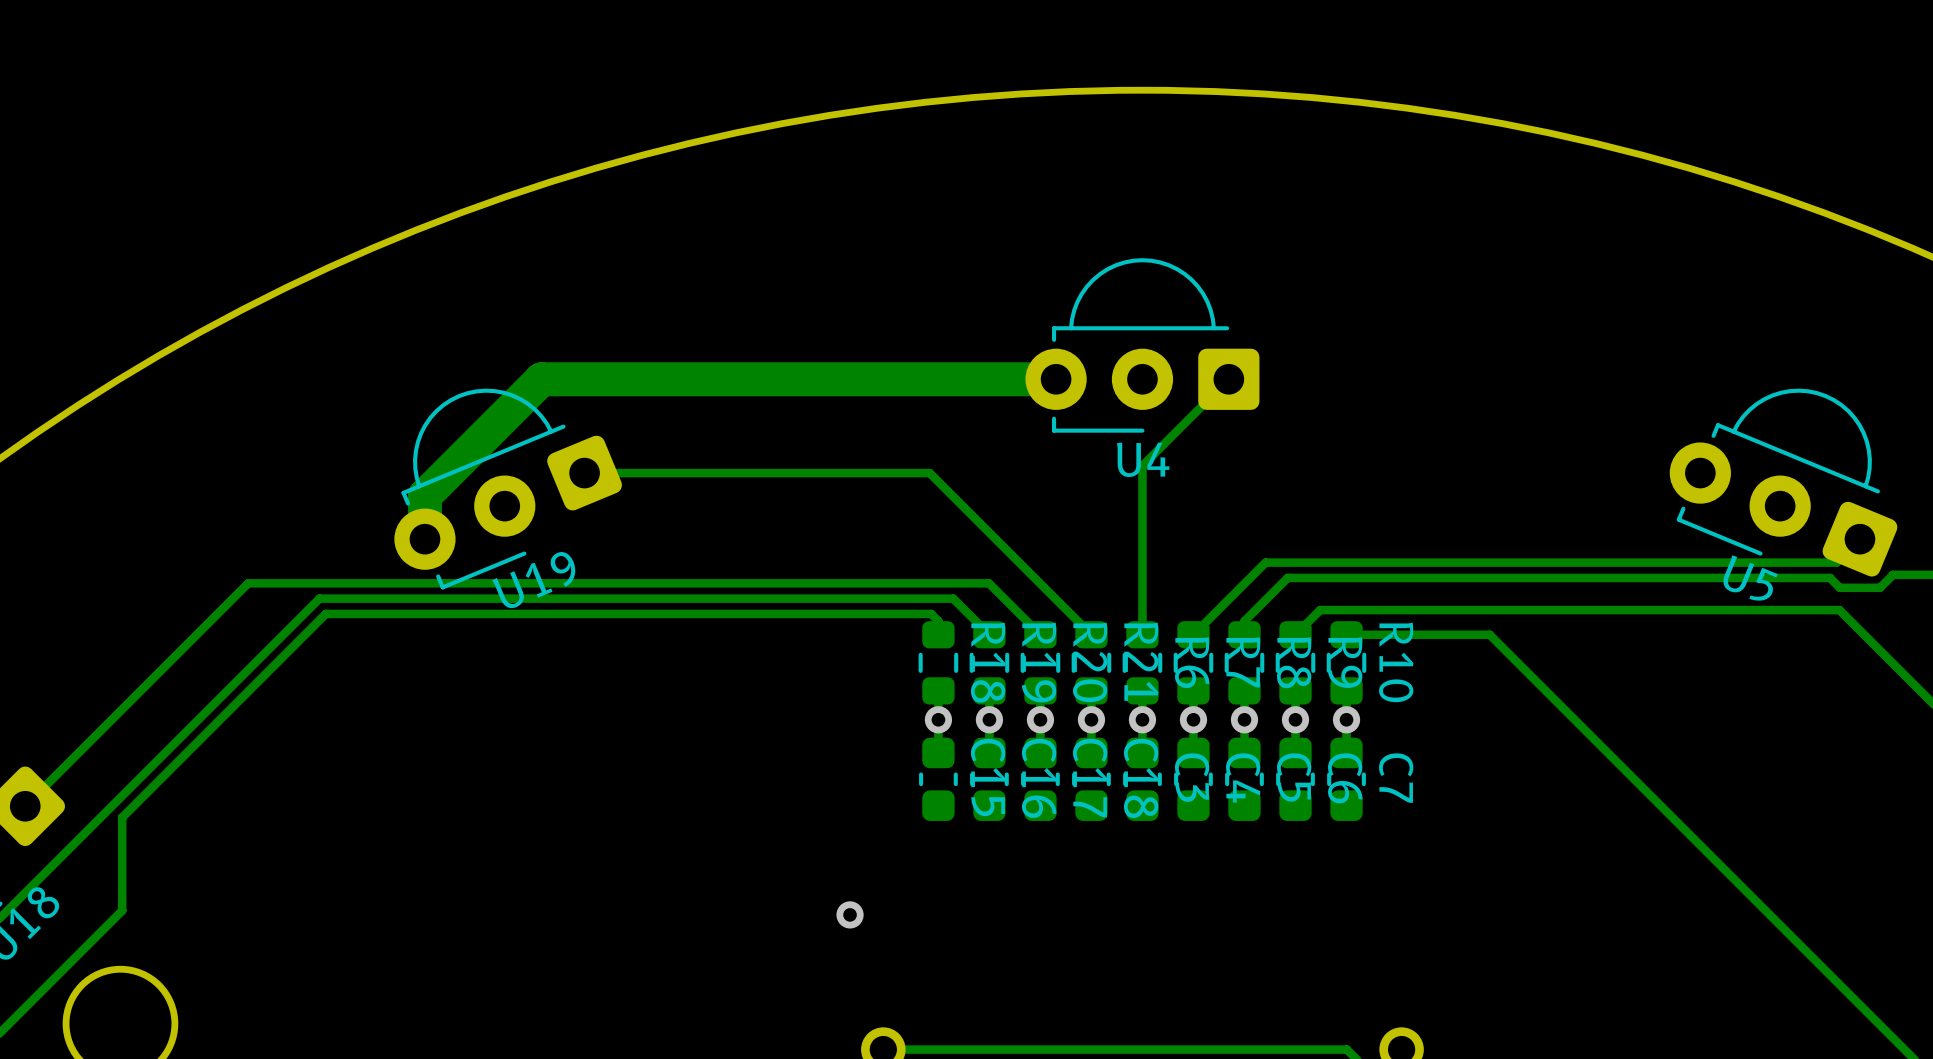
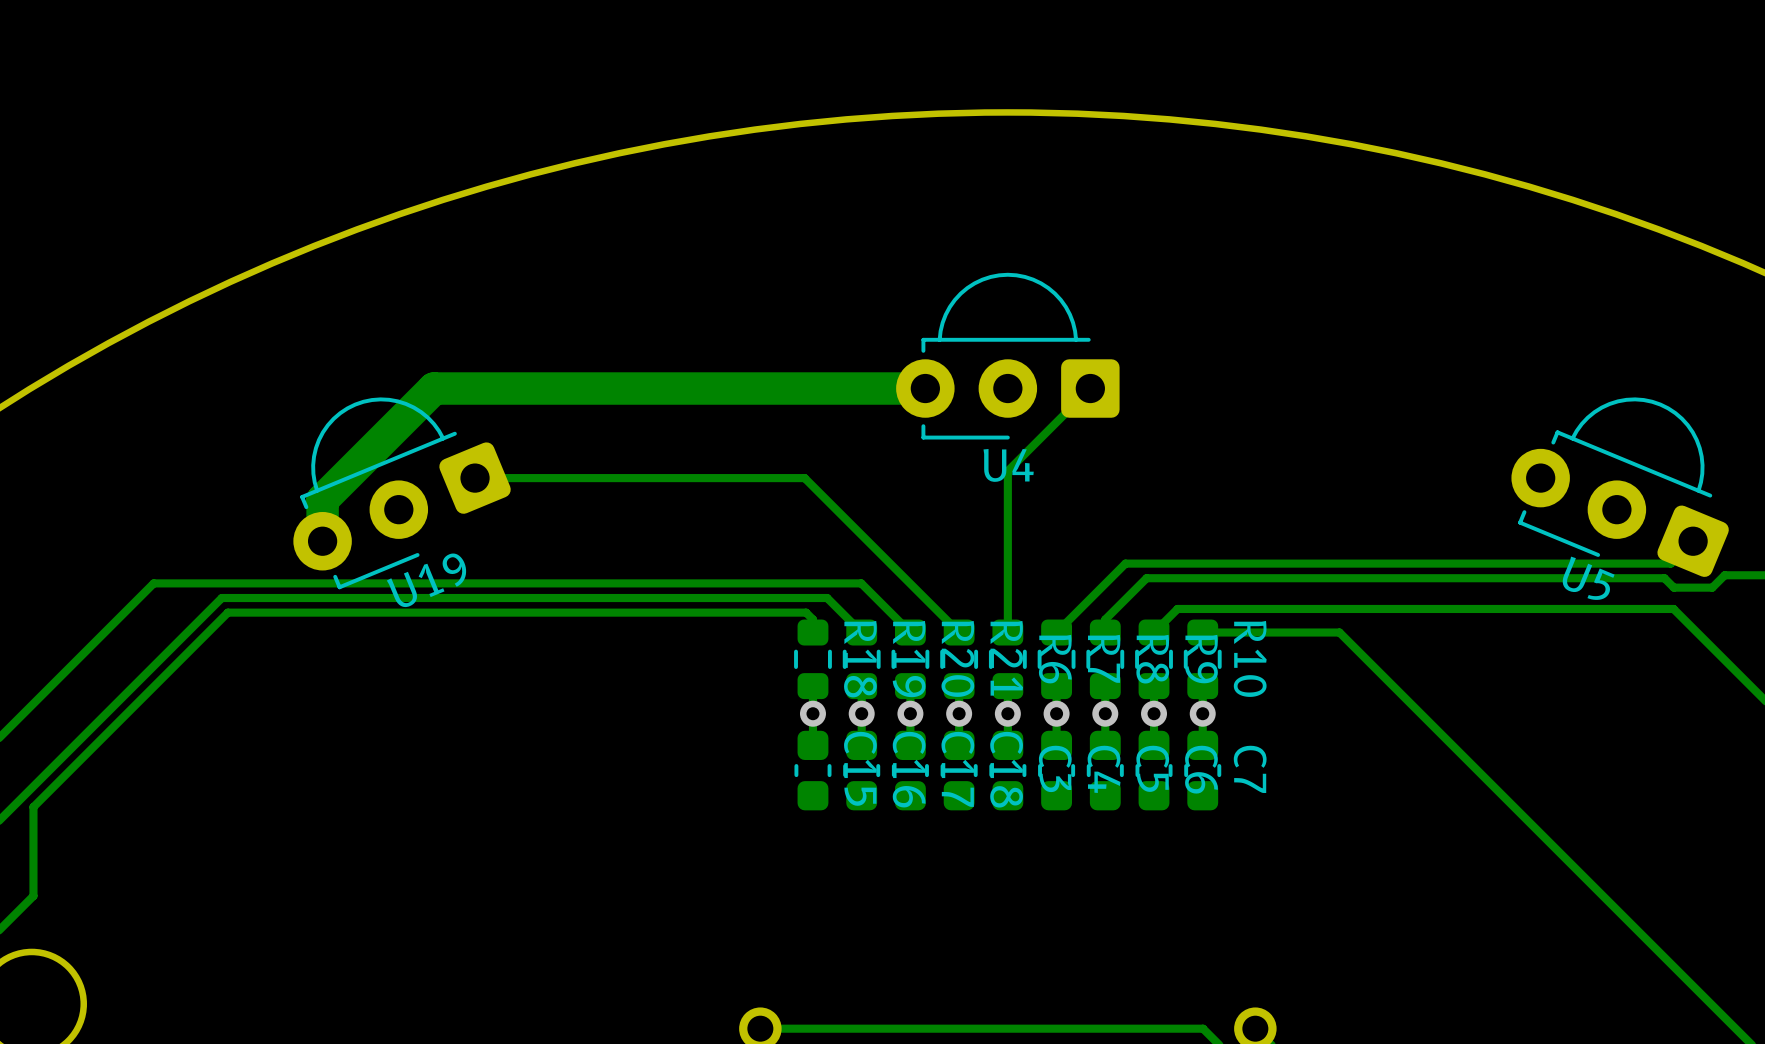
via: (850, 914) -> none

